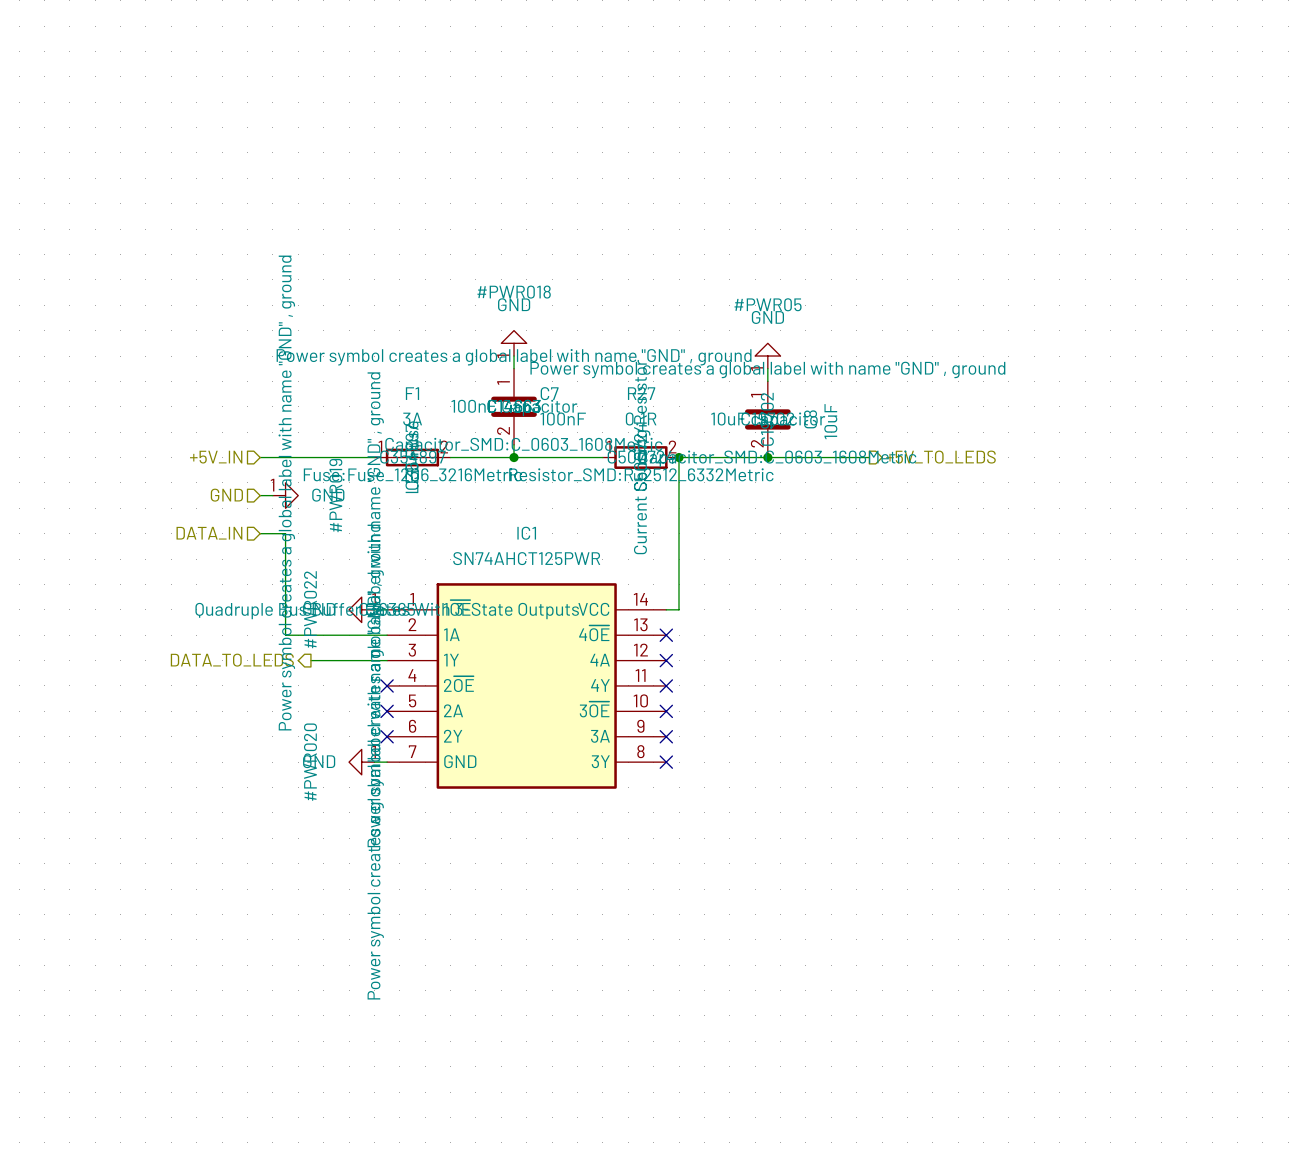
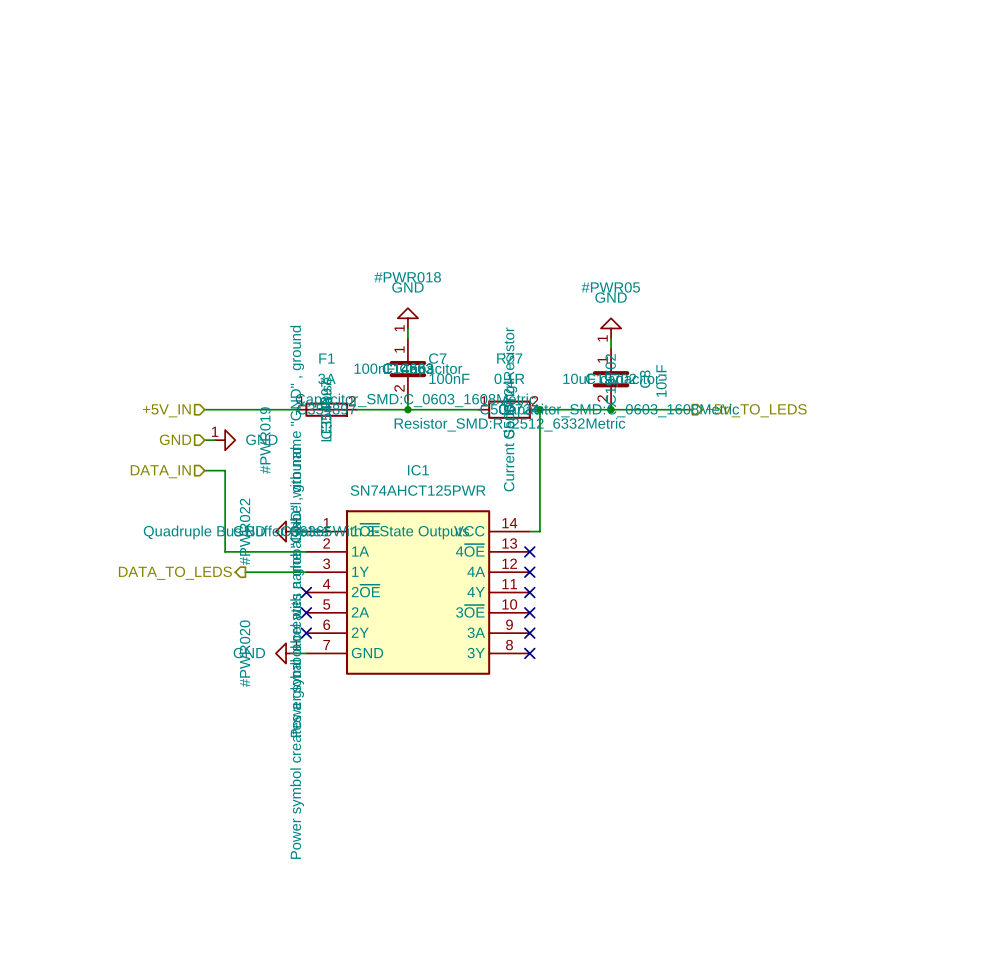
#PWR018 text: Power symbol creates a global label with name "GND" , ground (514, 357) -> none
#PWR05 text: Power symbol creates a global label with name "GND" , ground (767, 369) -> none
F1 text: Fuse:Fuse_1206_3216Metric (412, 474) -> none
#PWR019 text: Power symbol creates a global label with name "GND" , ground (286, 493) -> none

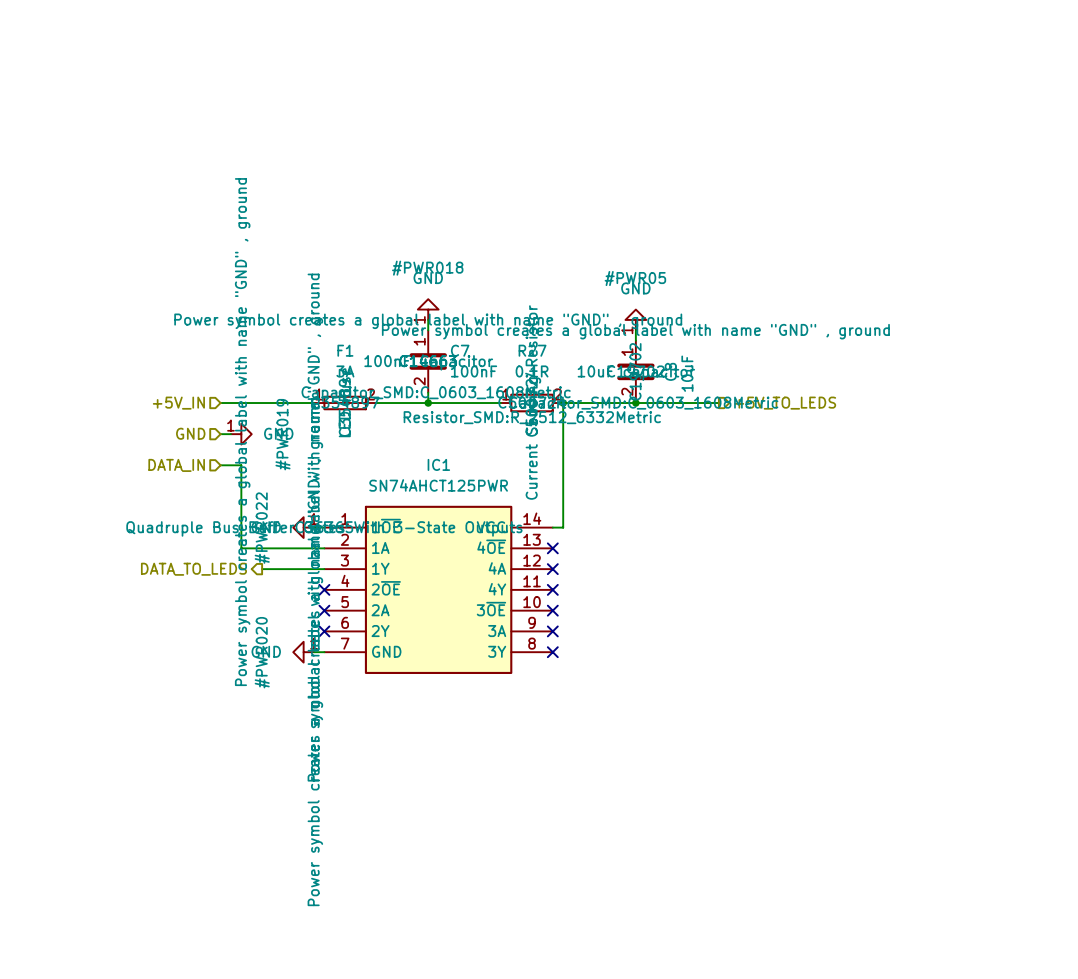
#PWR018 text: none -> Power symbol creates a global label with name "GND" , ground (428, 321)
#PWR05 text: none -> Power symbol creates a global label with name "GND" , ground (635, 331)
#PWR019 text: none -> Power symbol creates a global label with name "GND" , ground (242, 432)

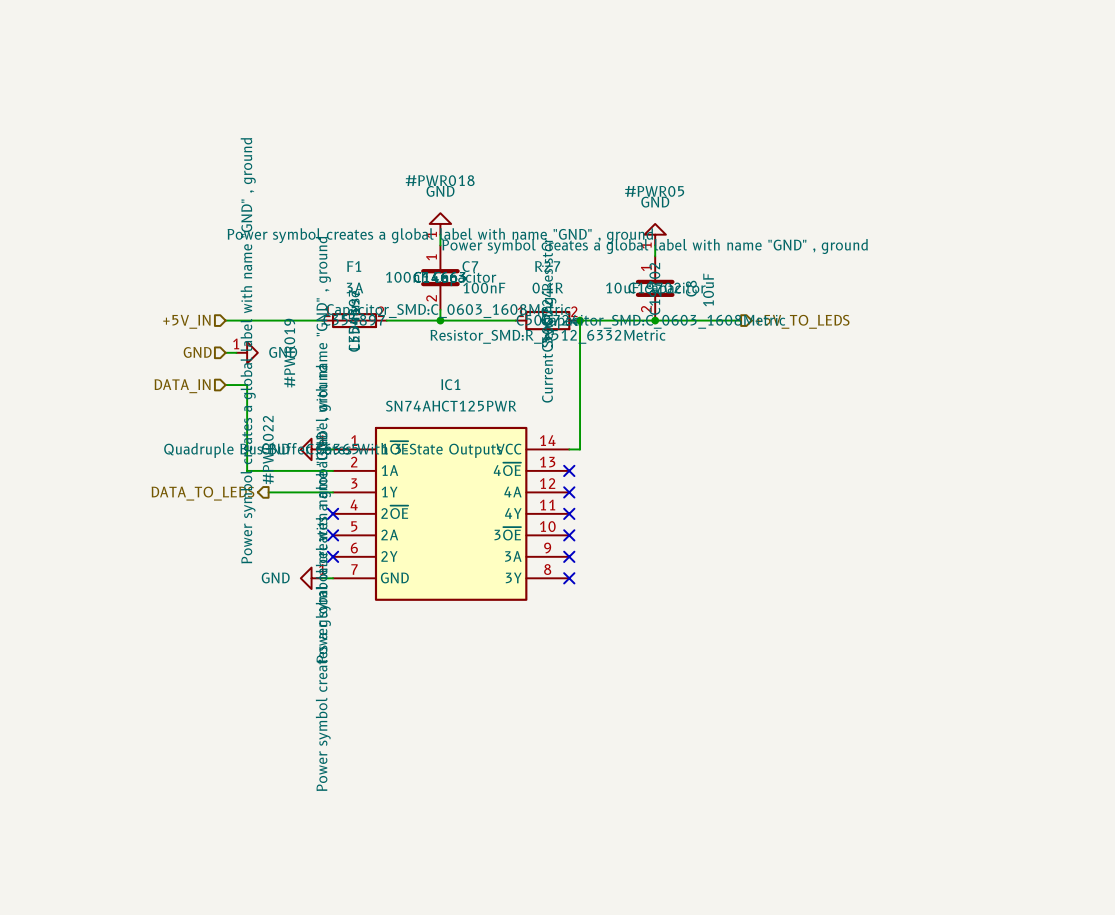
#PWR020 name: #PWR020 (262, 652) -> none

